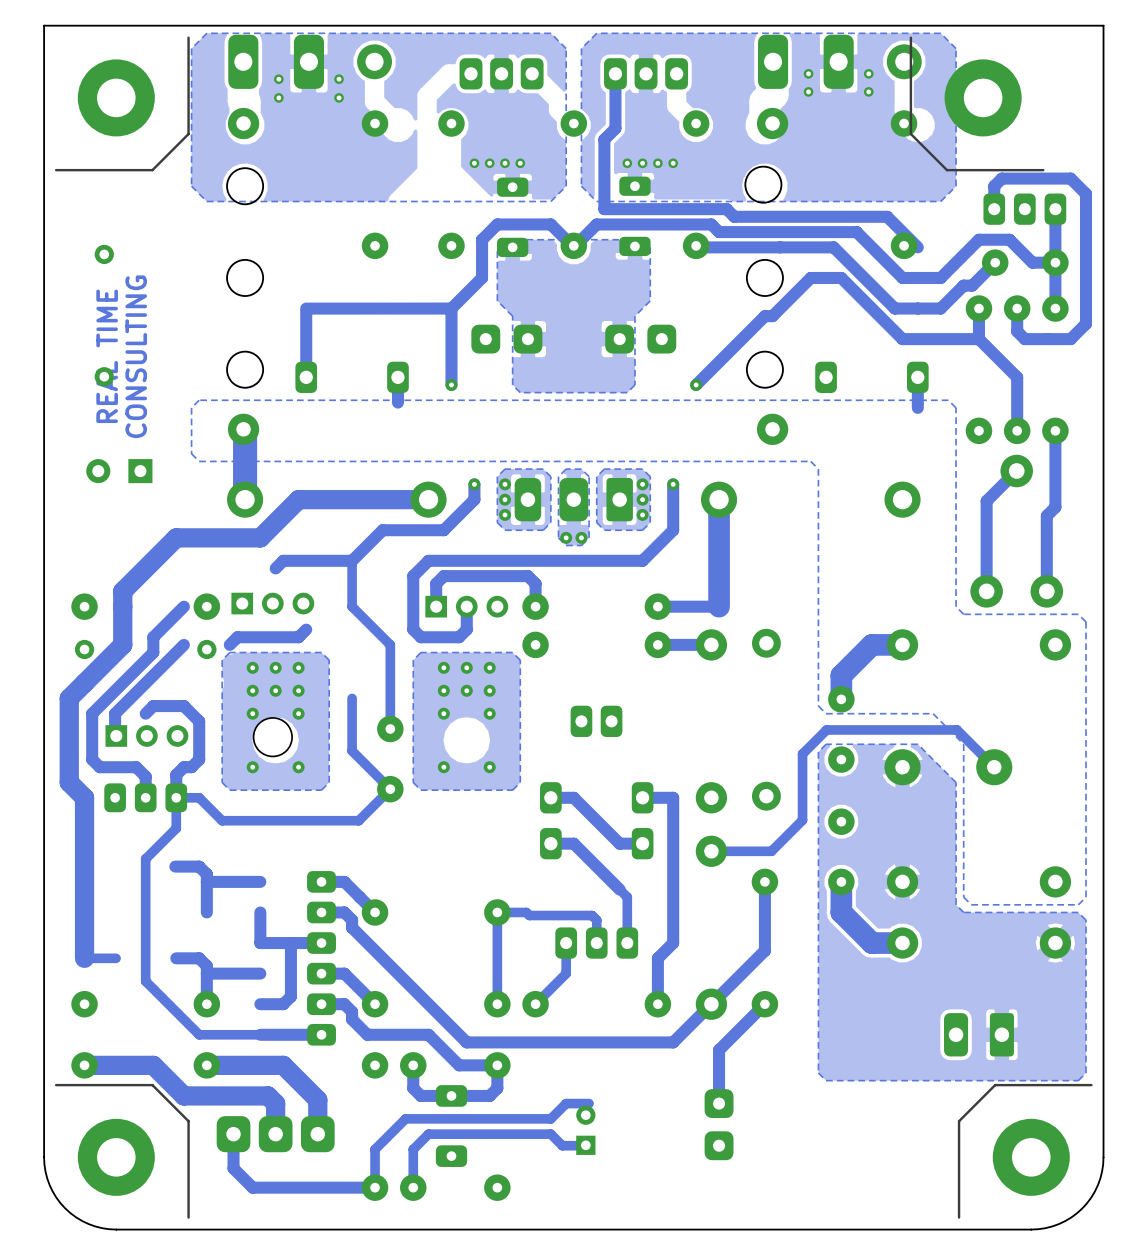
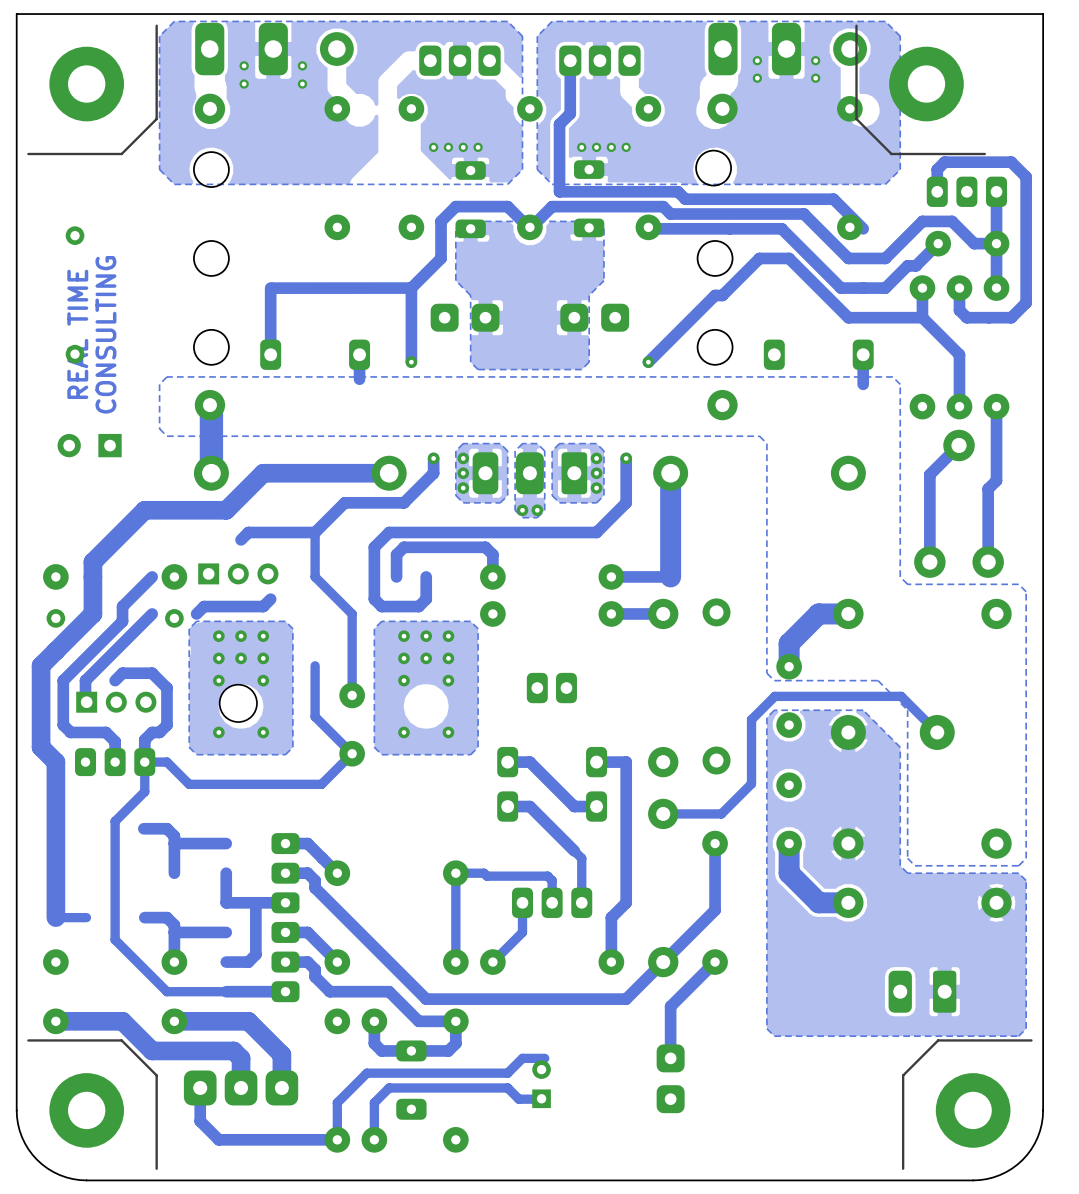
part: (466, 606) -> none

